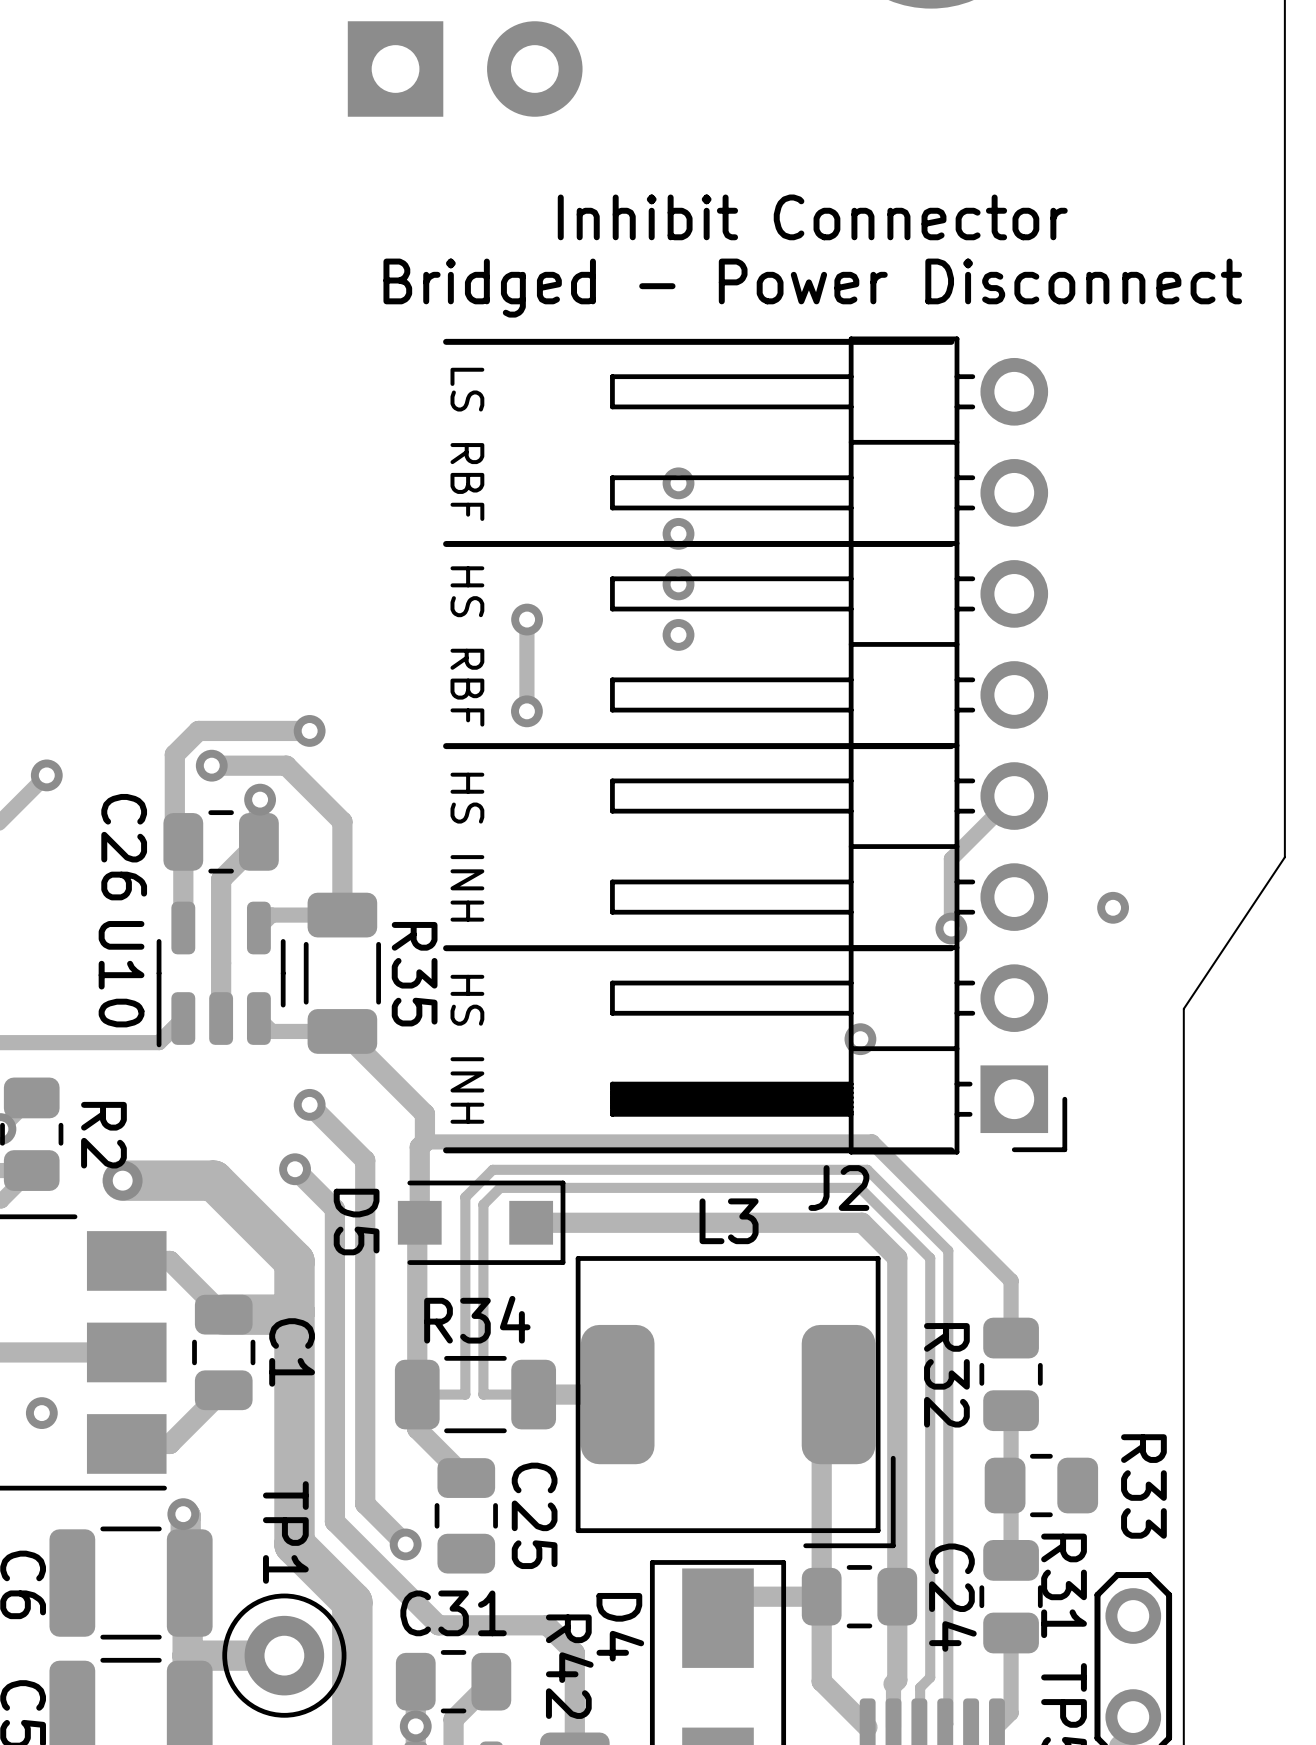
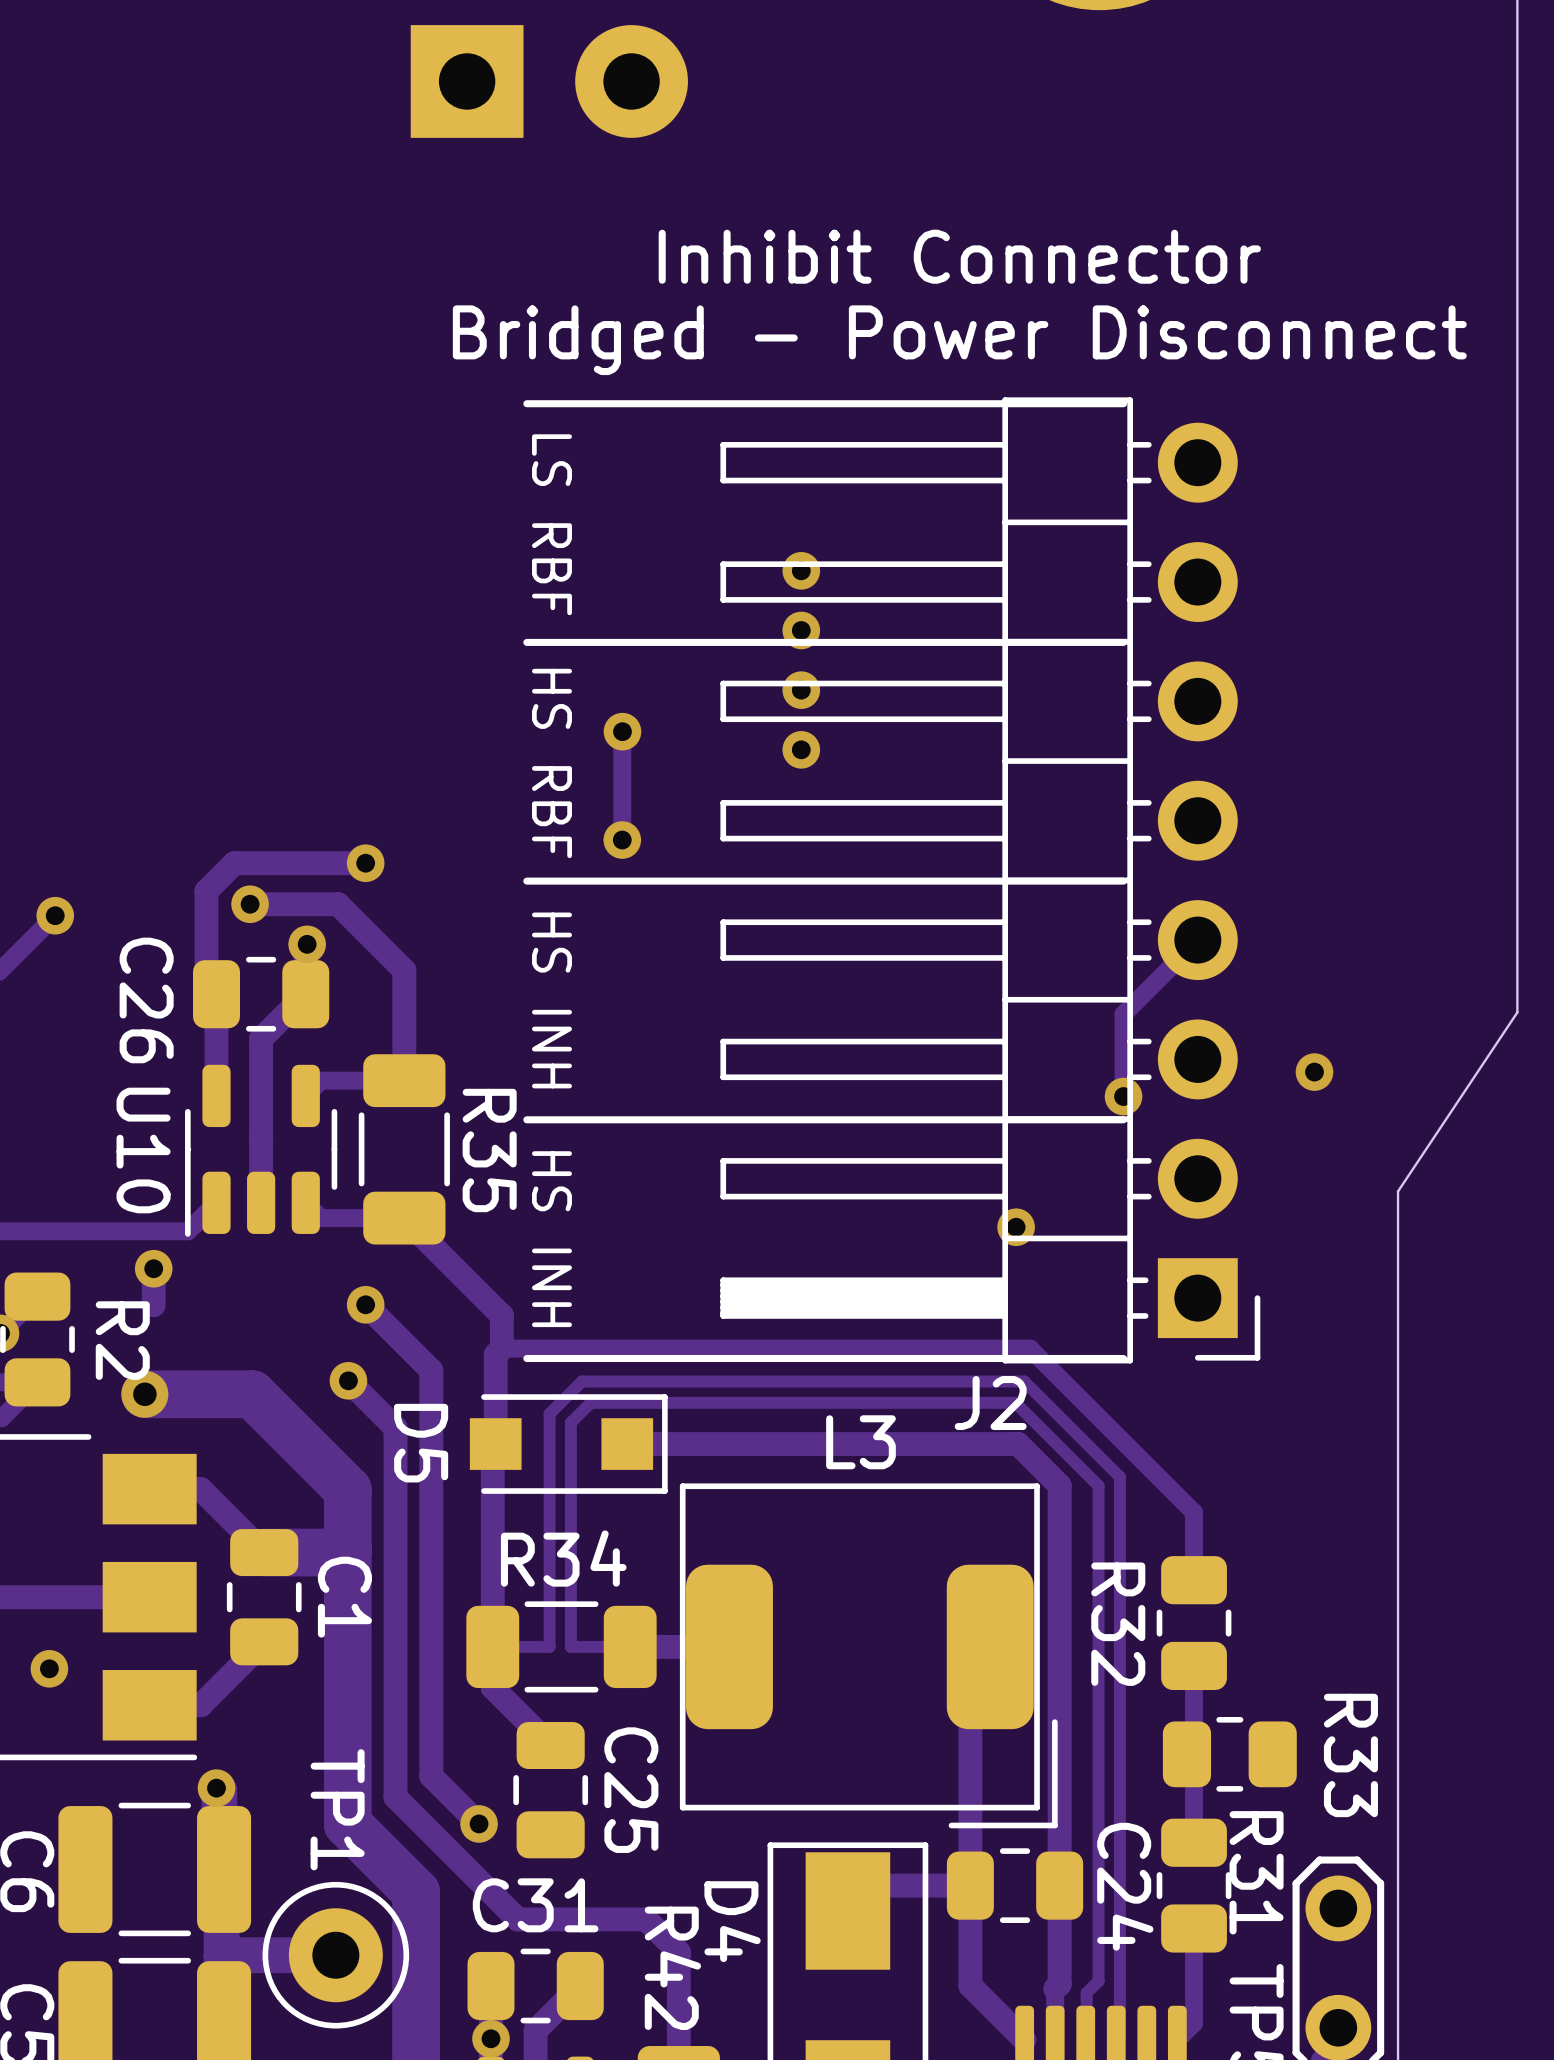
track: none -> (153, 1268) (153, 1305)
via: none -> (153, 1268)

